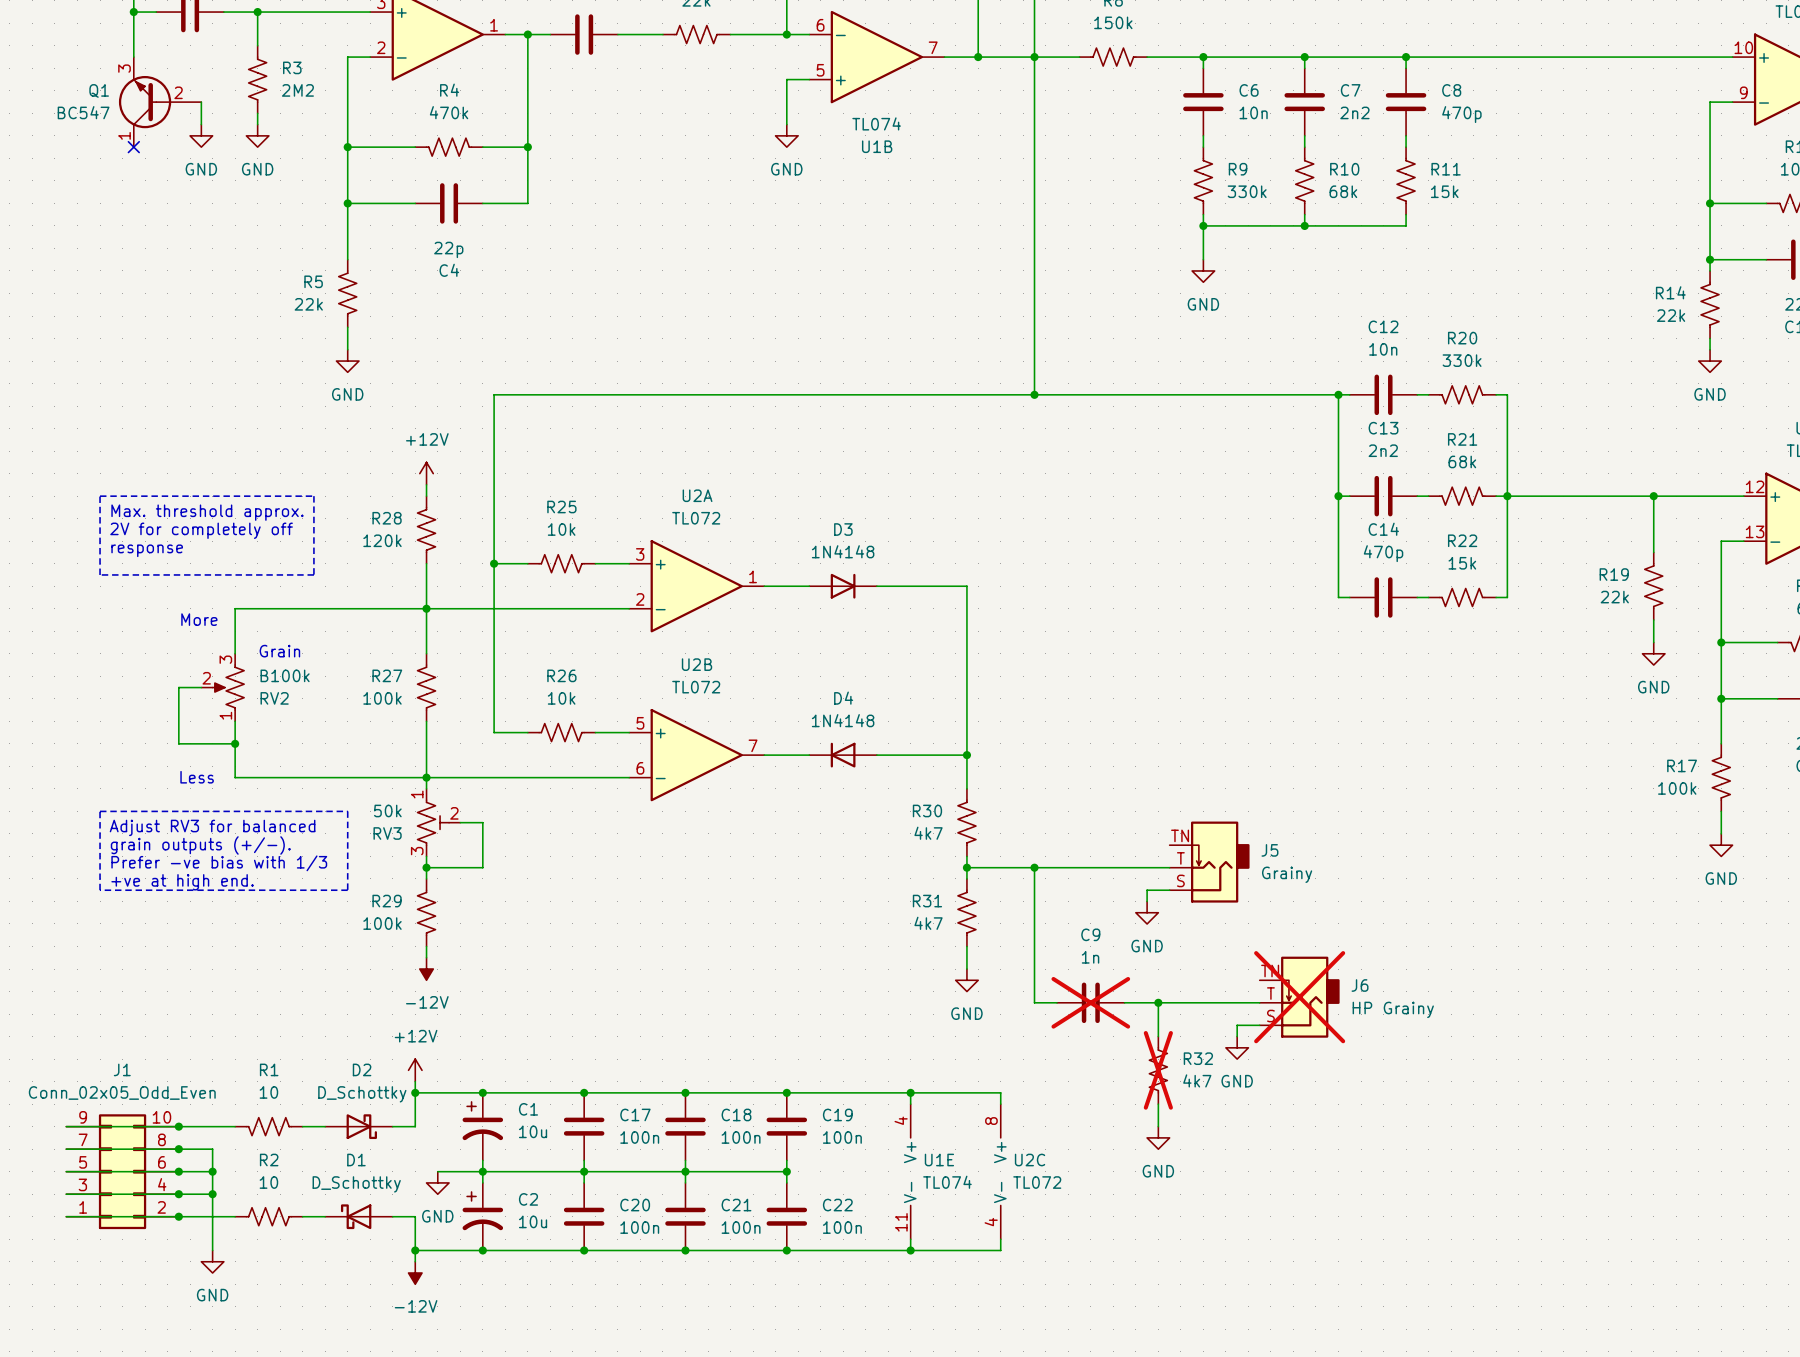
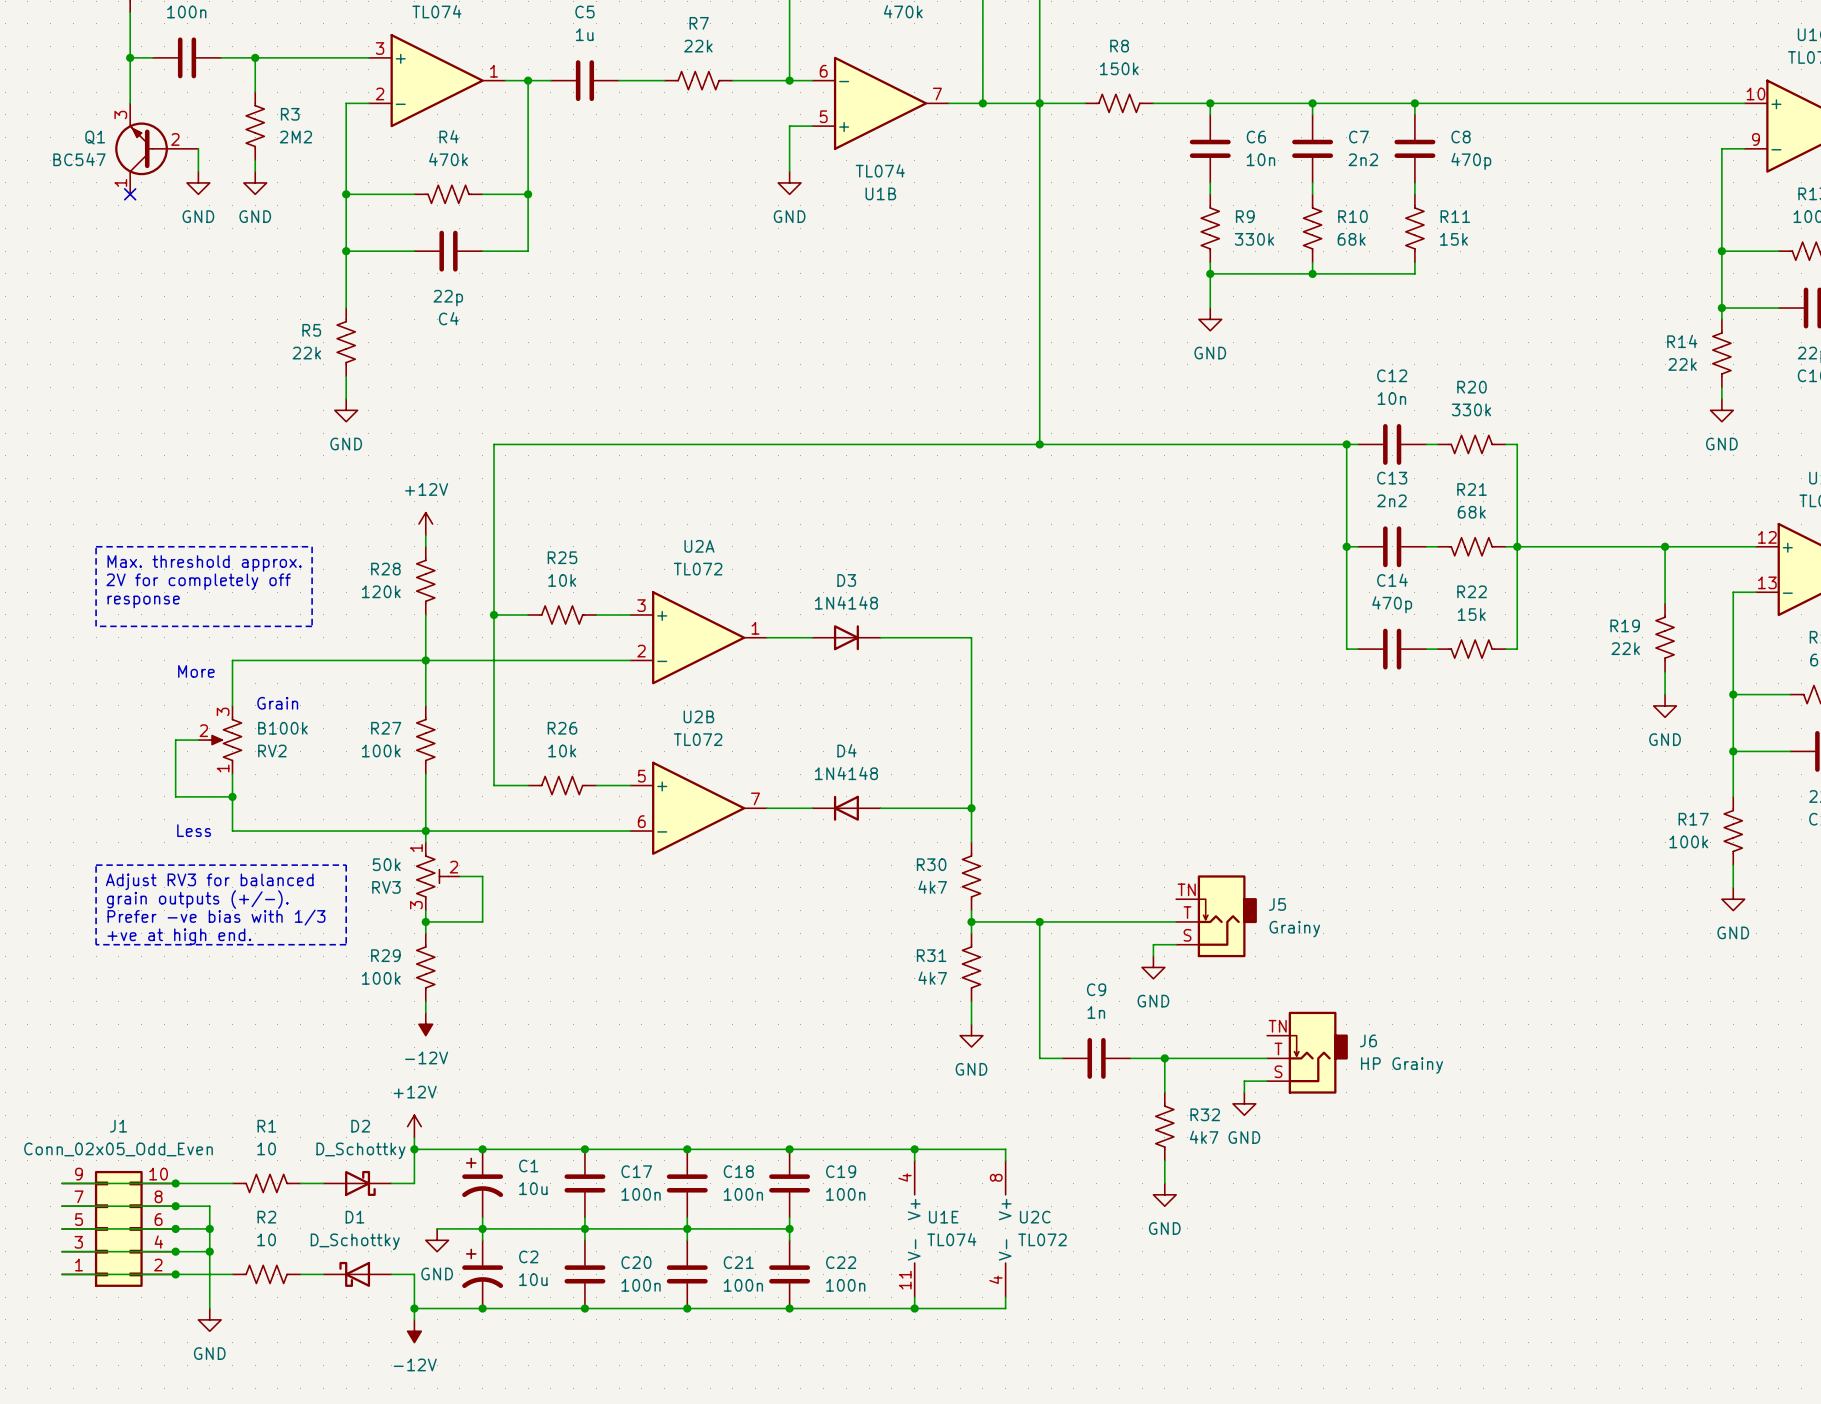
J6 do-not-place cross: (1299, 997) -> none
C9 do-not-place cross: (1090, 1002) -> none
R32 do-not-place cross: (1158, 1070) -> none

